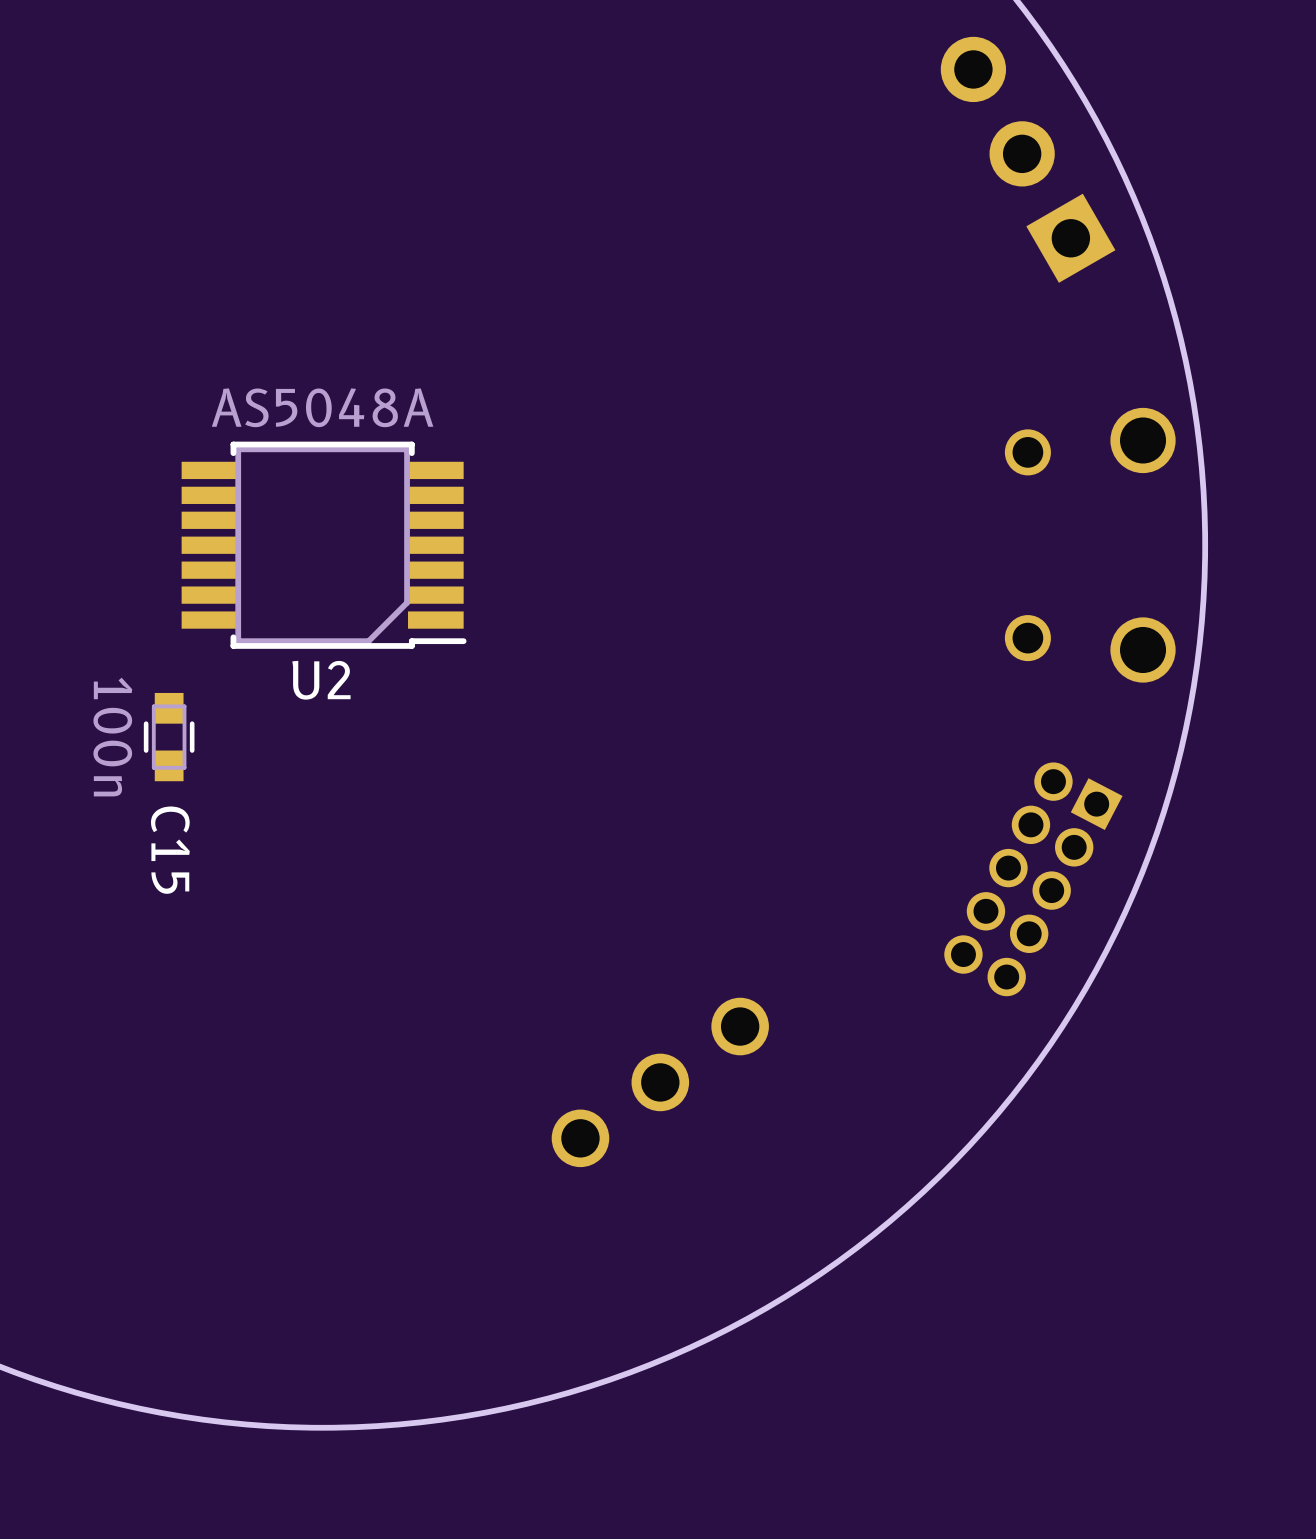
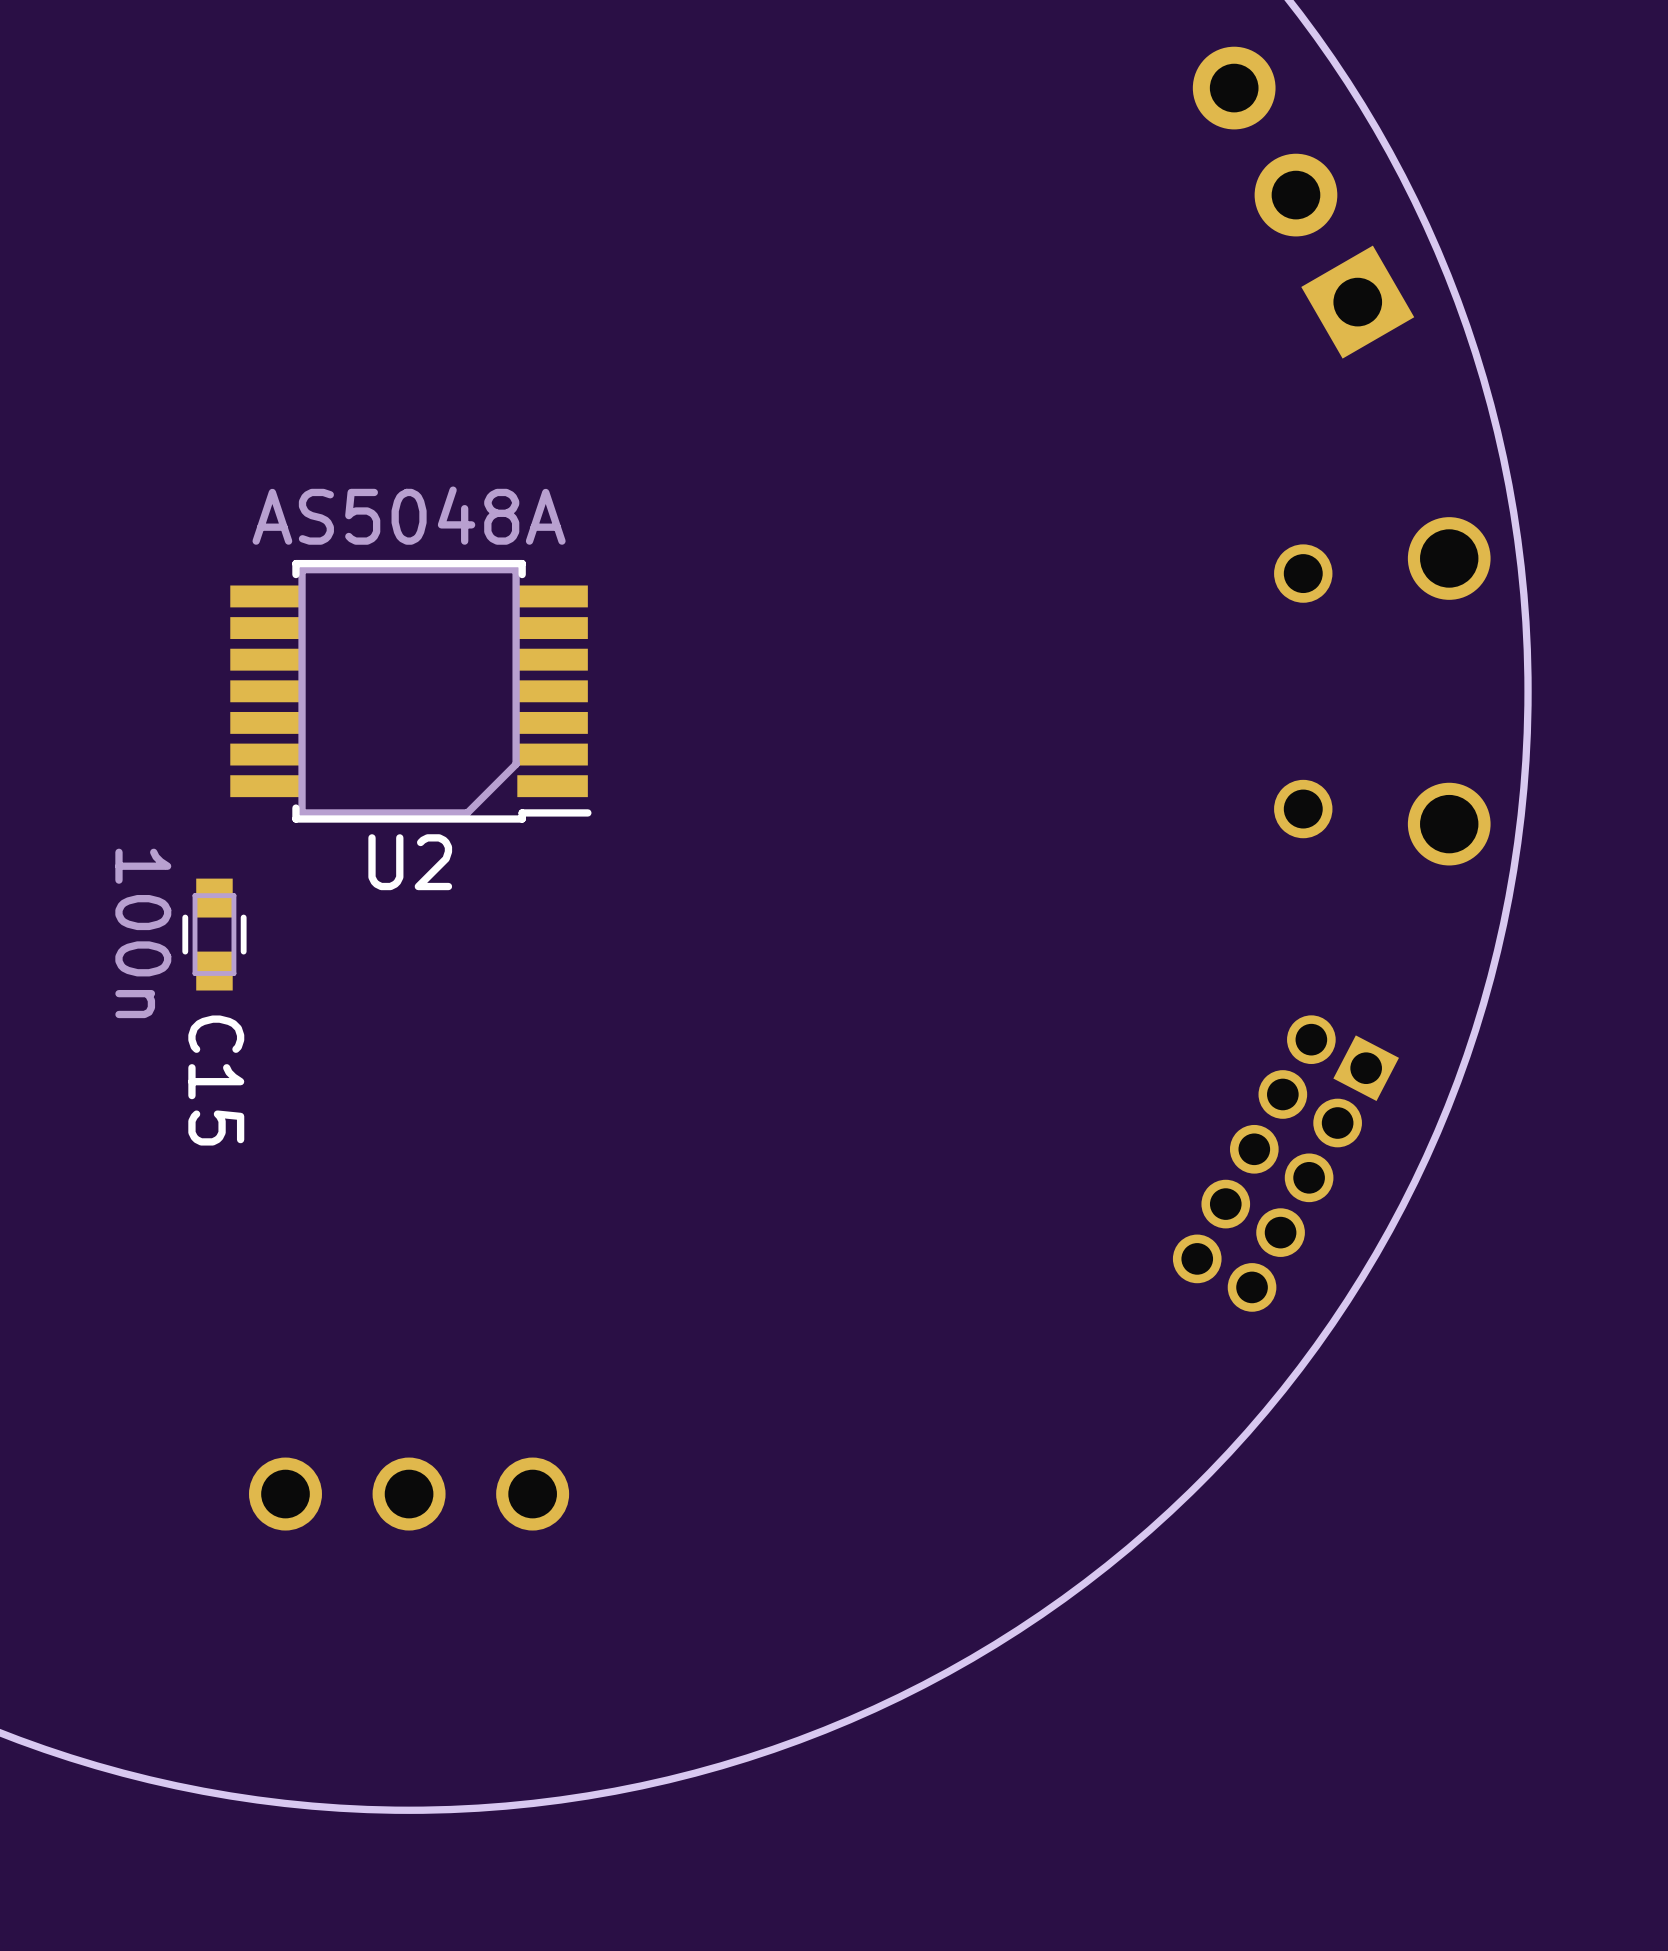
part position: (1033, 879) -> (1285, 1163)
part: (660, 1082) -> none
part: none -> (409, 1494)

